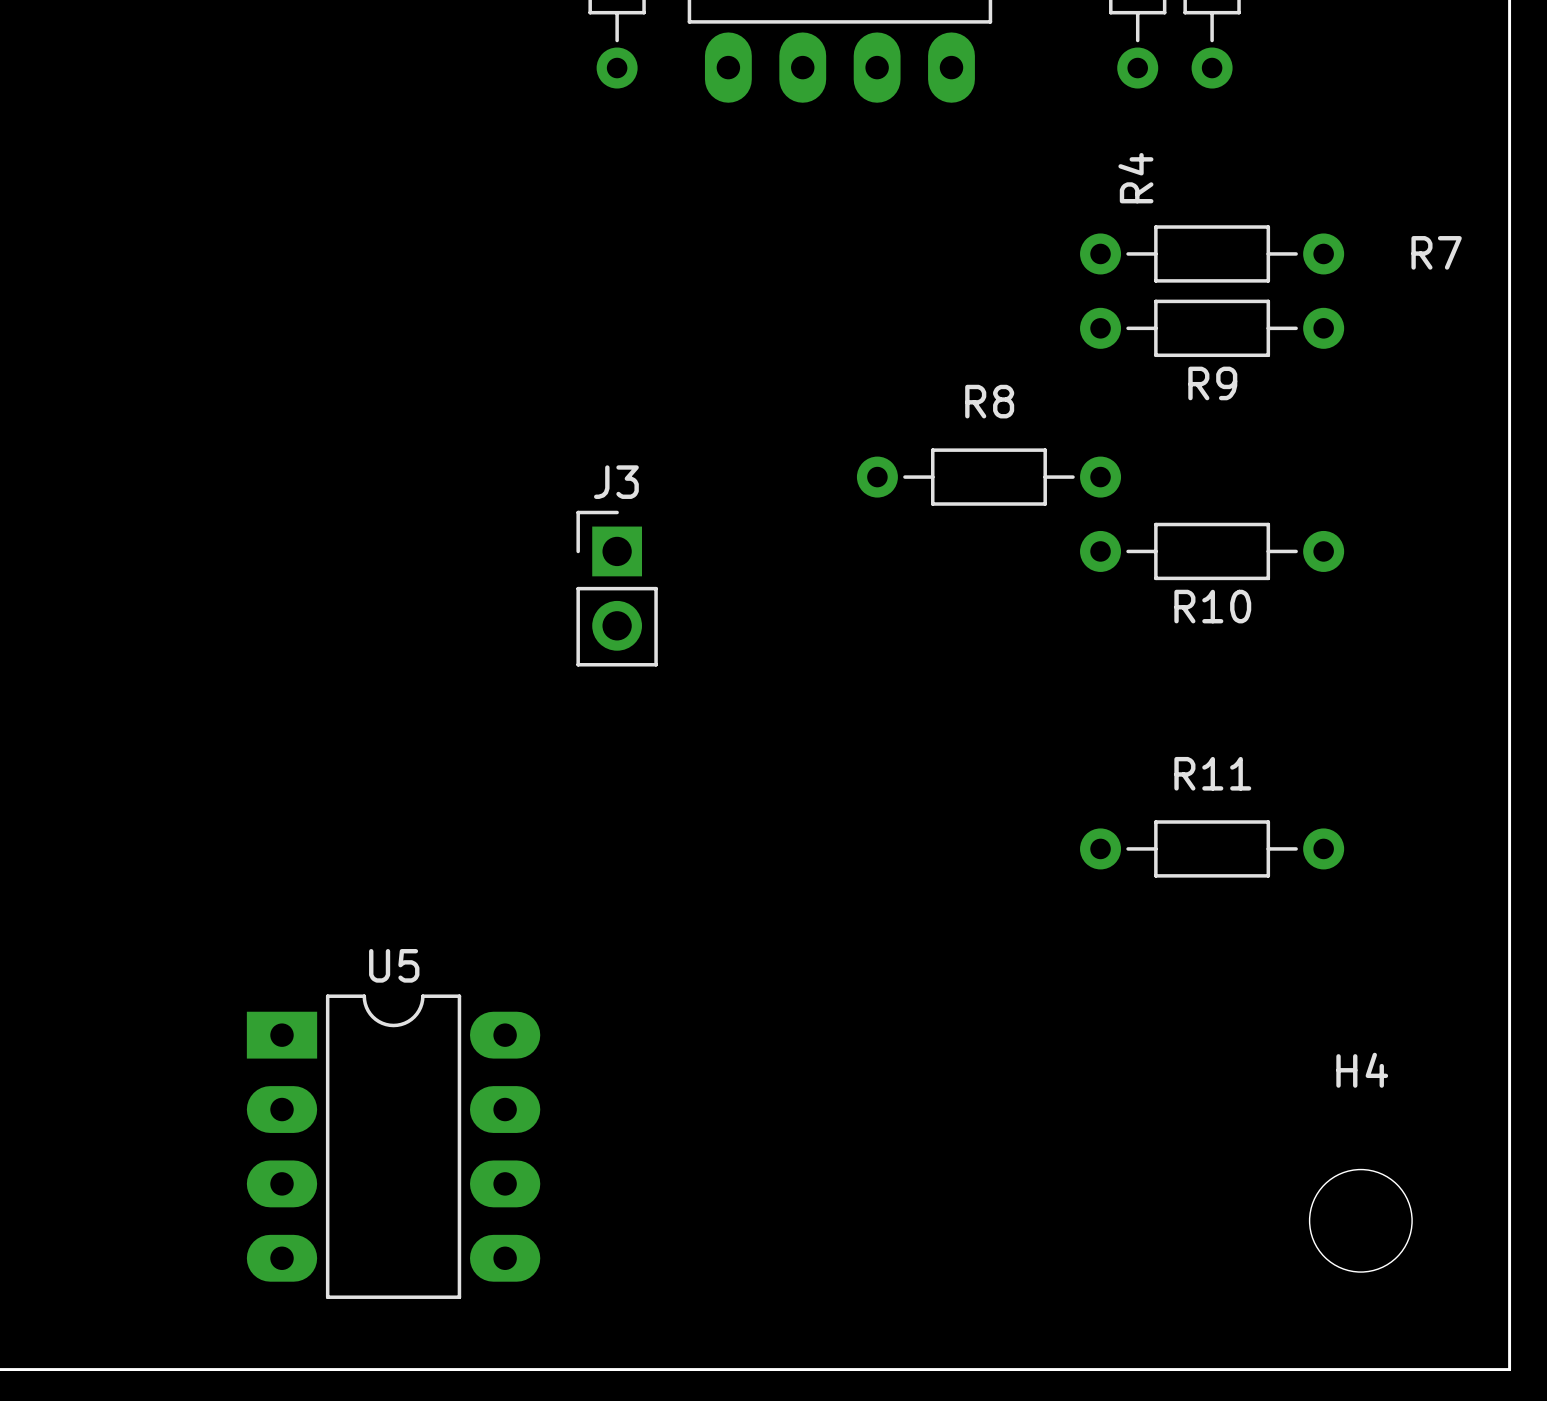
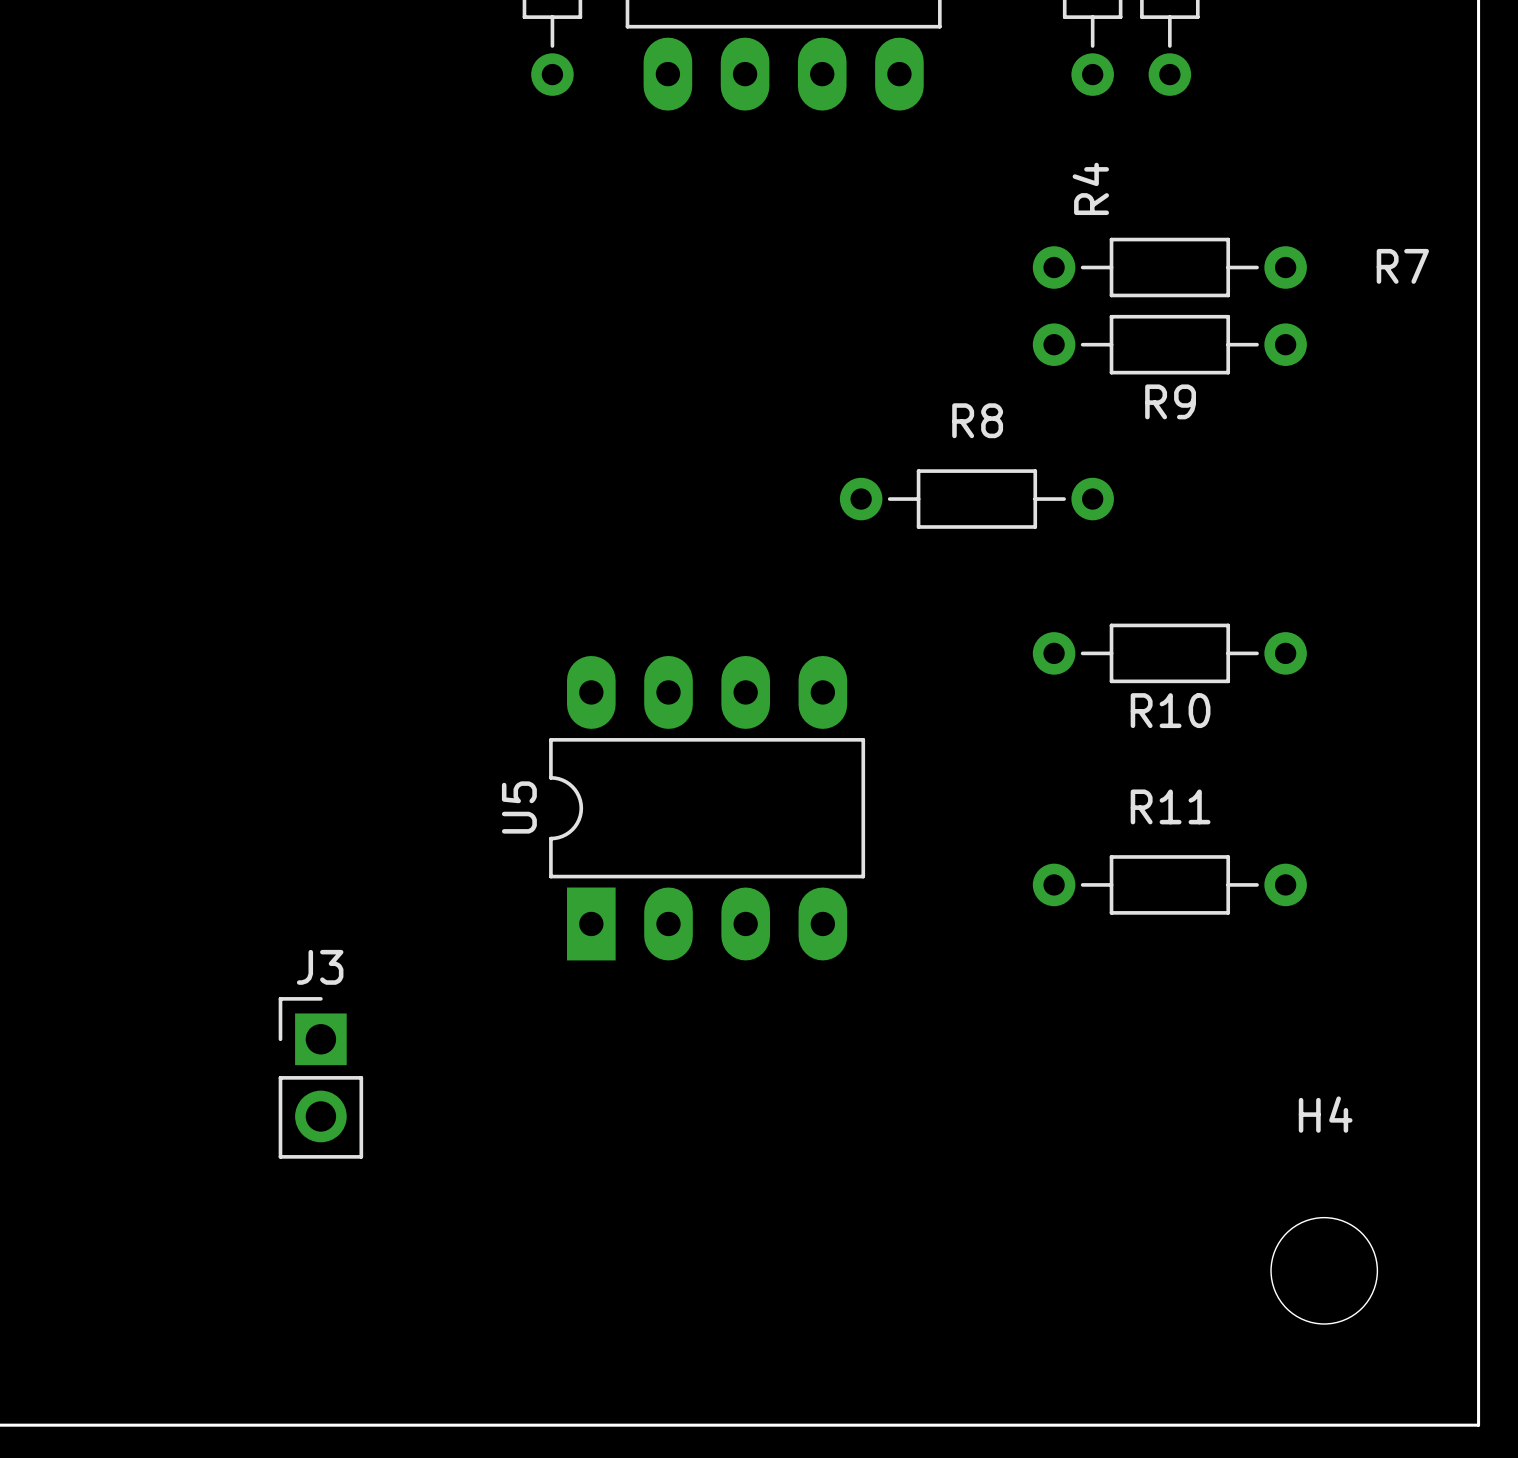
R8 position: (988, 477) -> (976, 499)
R10 position: (1212, 551) -> (1169, 653)
J3 position: (617, 588) -> (320, 1077)
U5 rotation: 0° (393, 1146) -> 90° counterclockwise (707, 808)
U5 position: (393, 1146) -> (707, 808)

